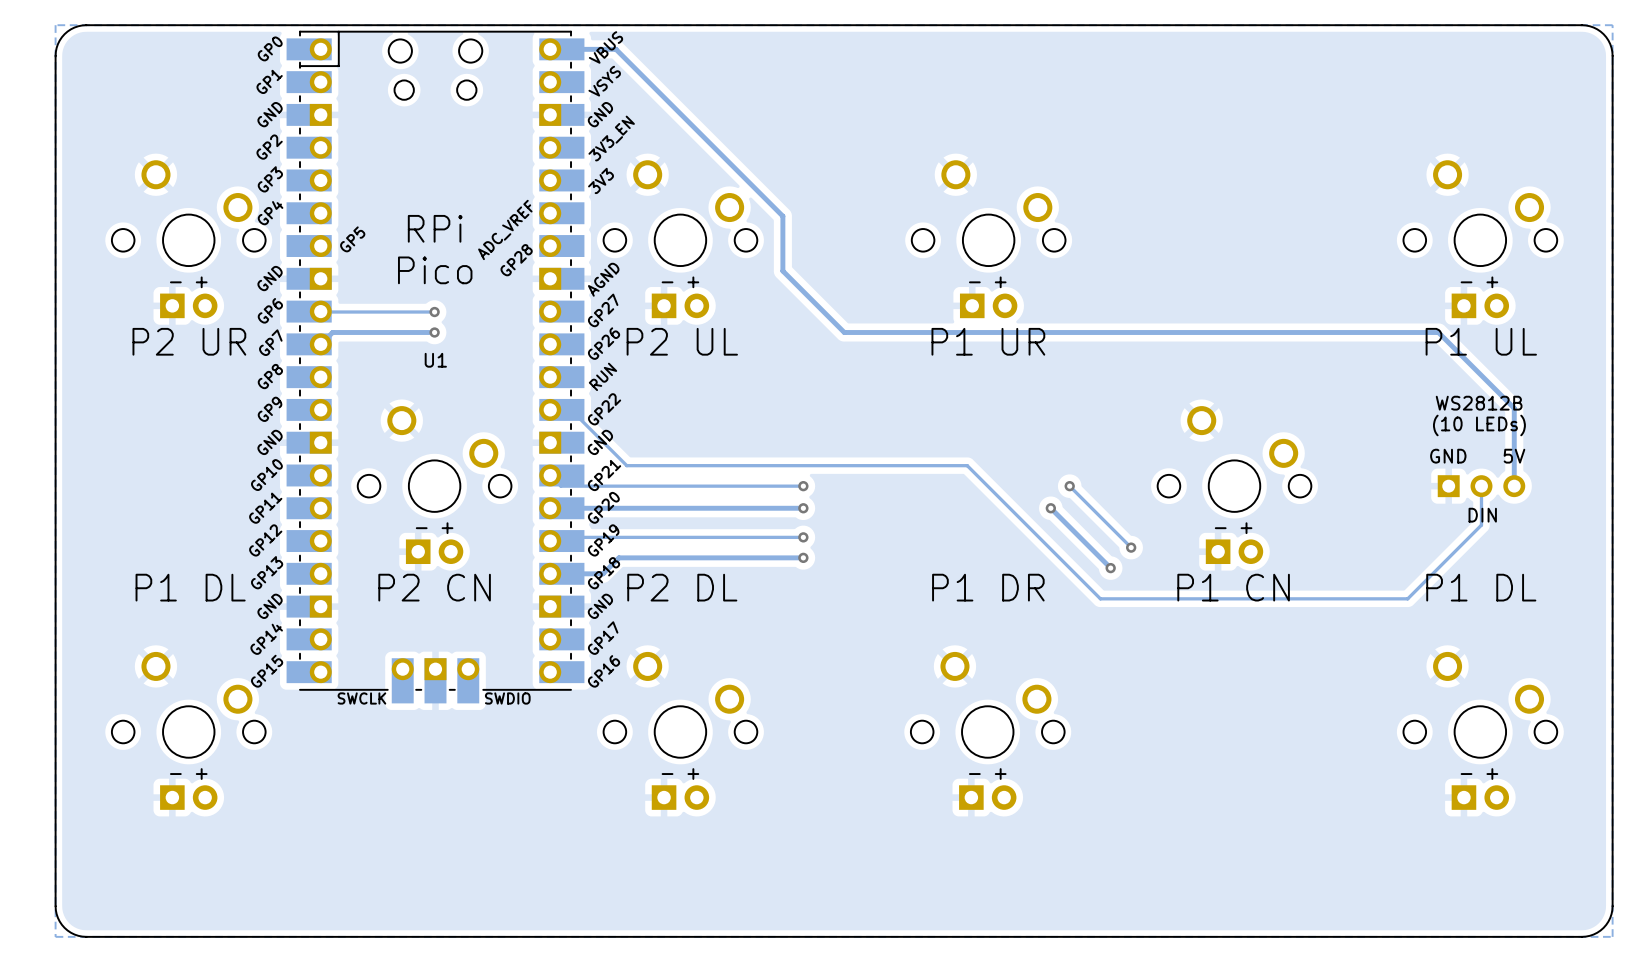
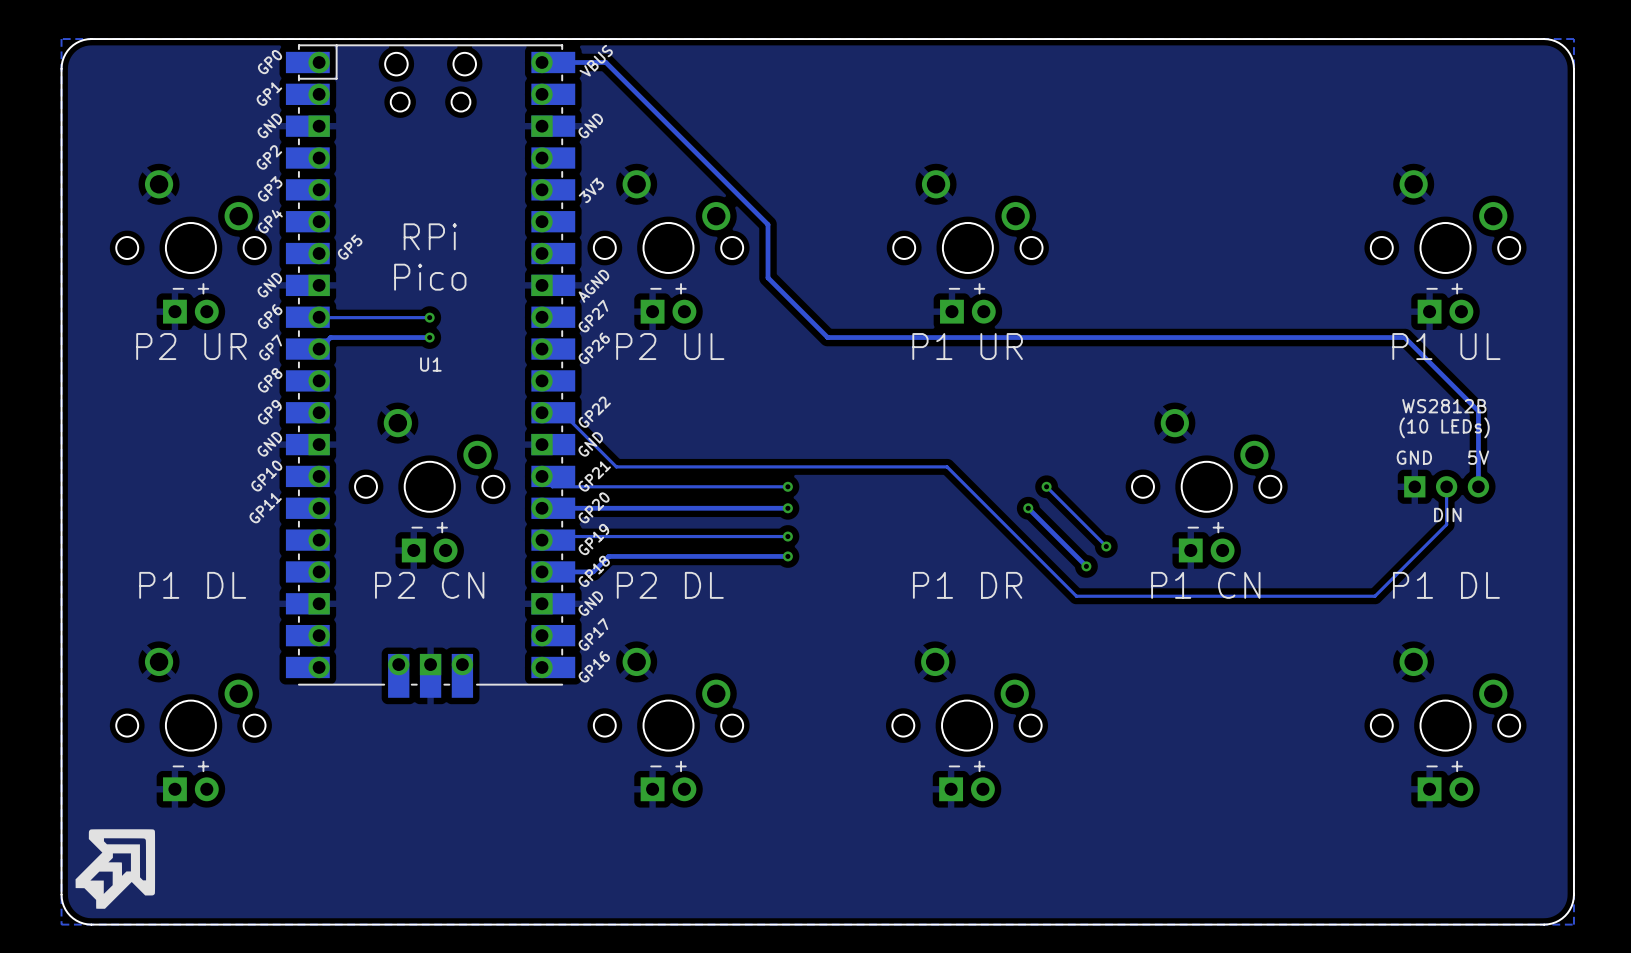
U1 footprint: [286, 30, 585, 704] -> [285, 44, 576, 698]
drawing: none -> [75, 829, 156, 909]

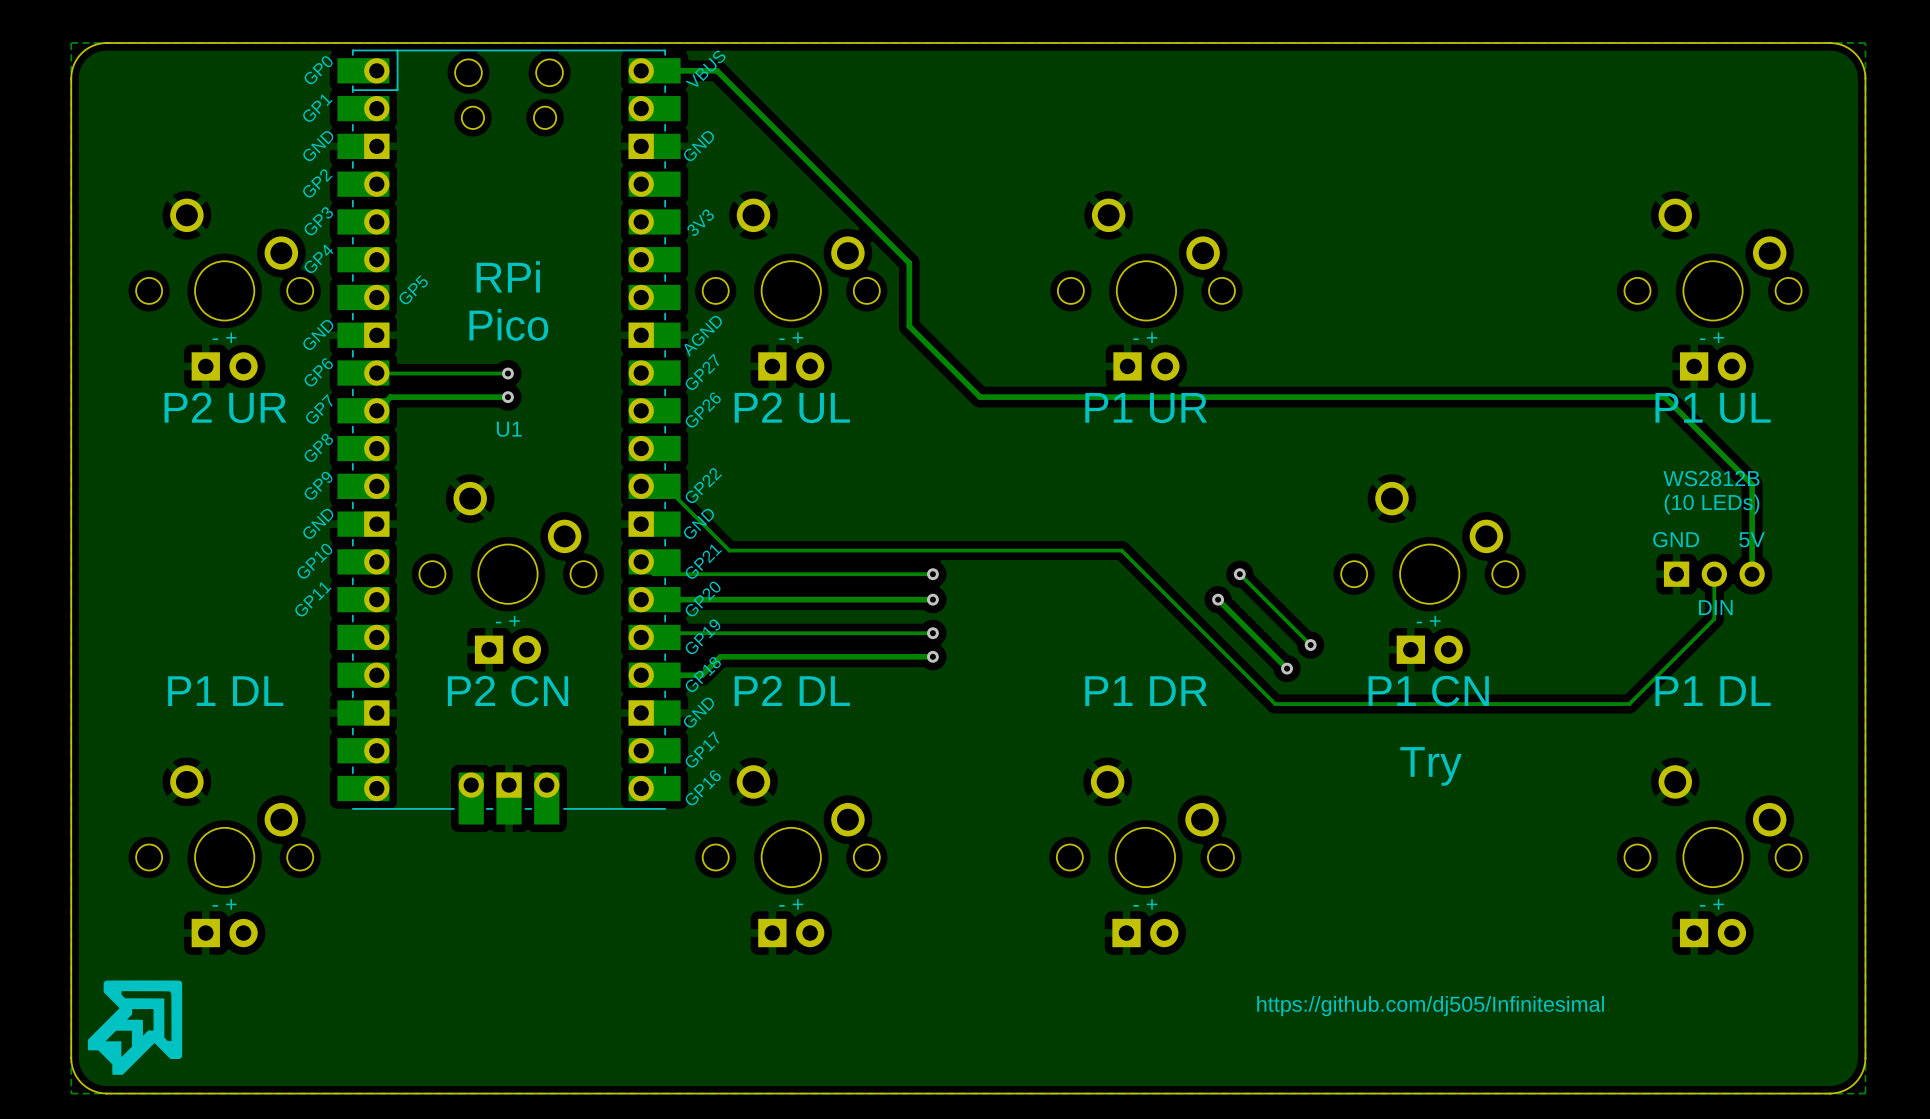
text: none -> Try (1431, 766)
text: none -> https://github.com/dj505/Infinitesimal (1430, 1006)

